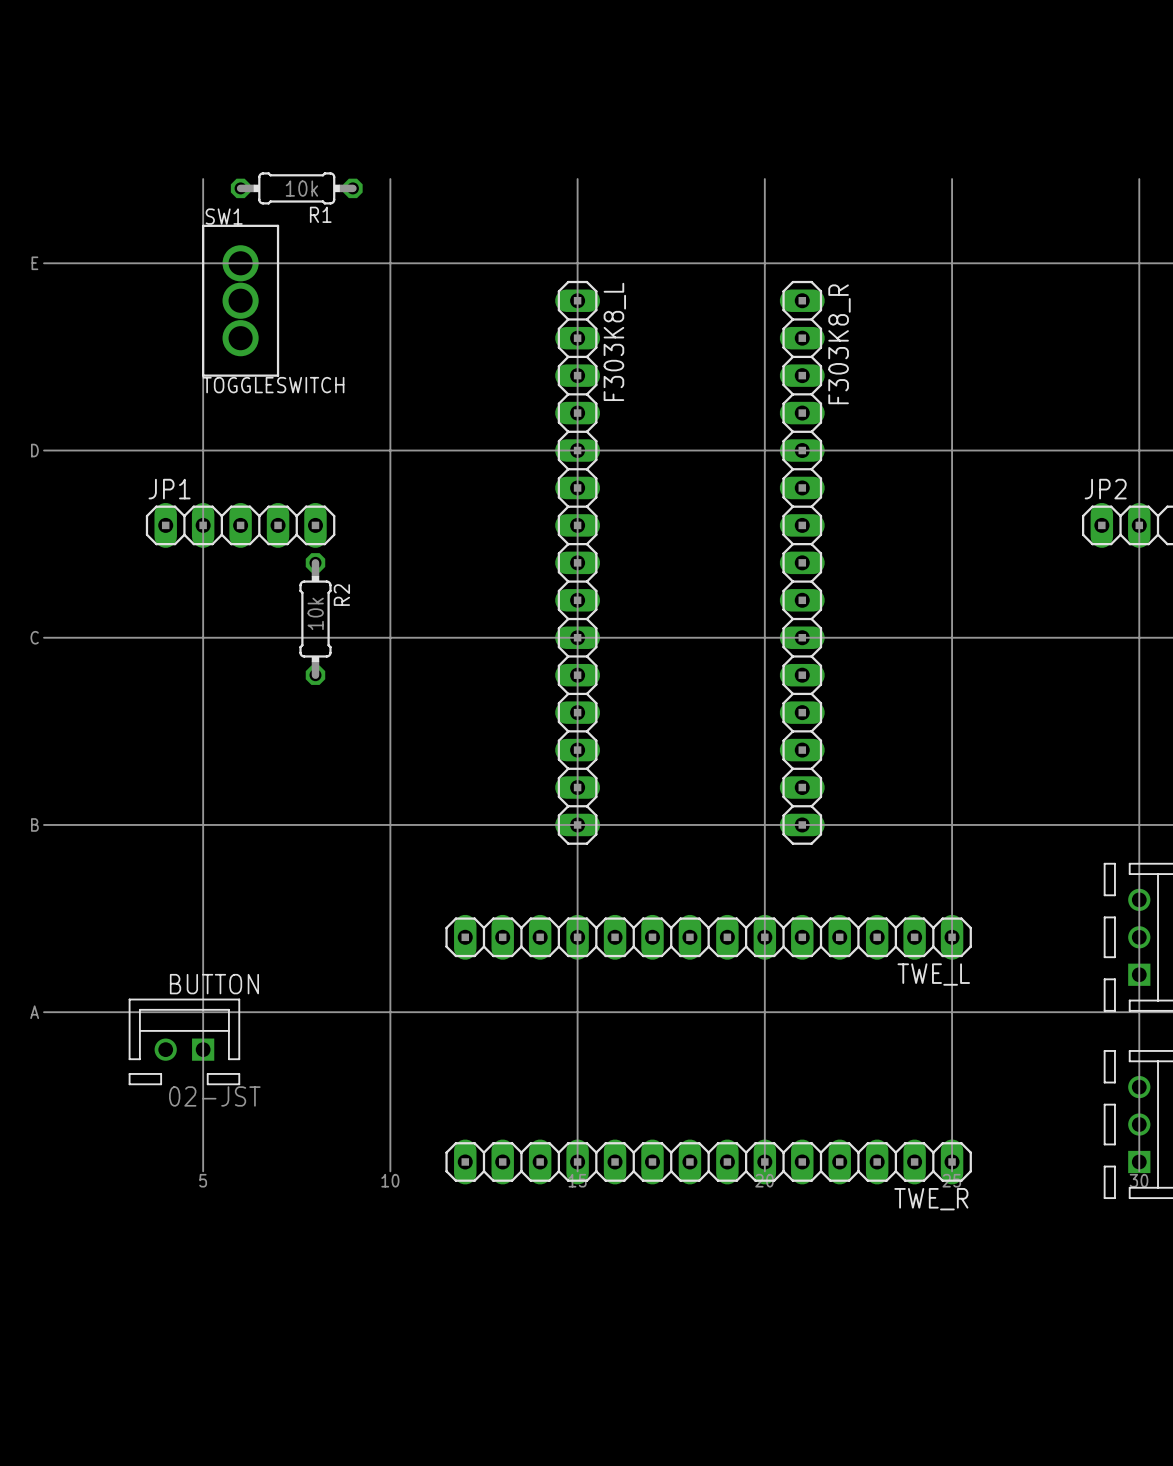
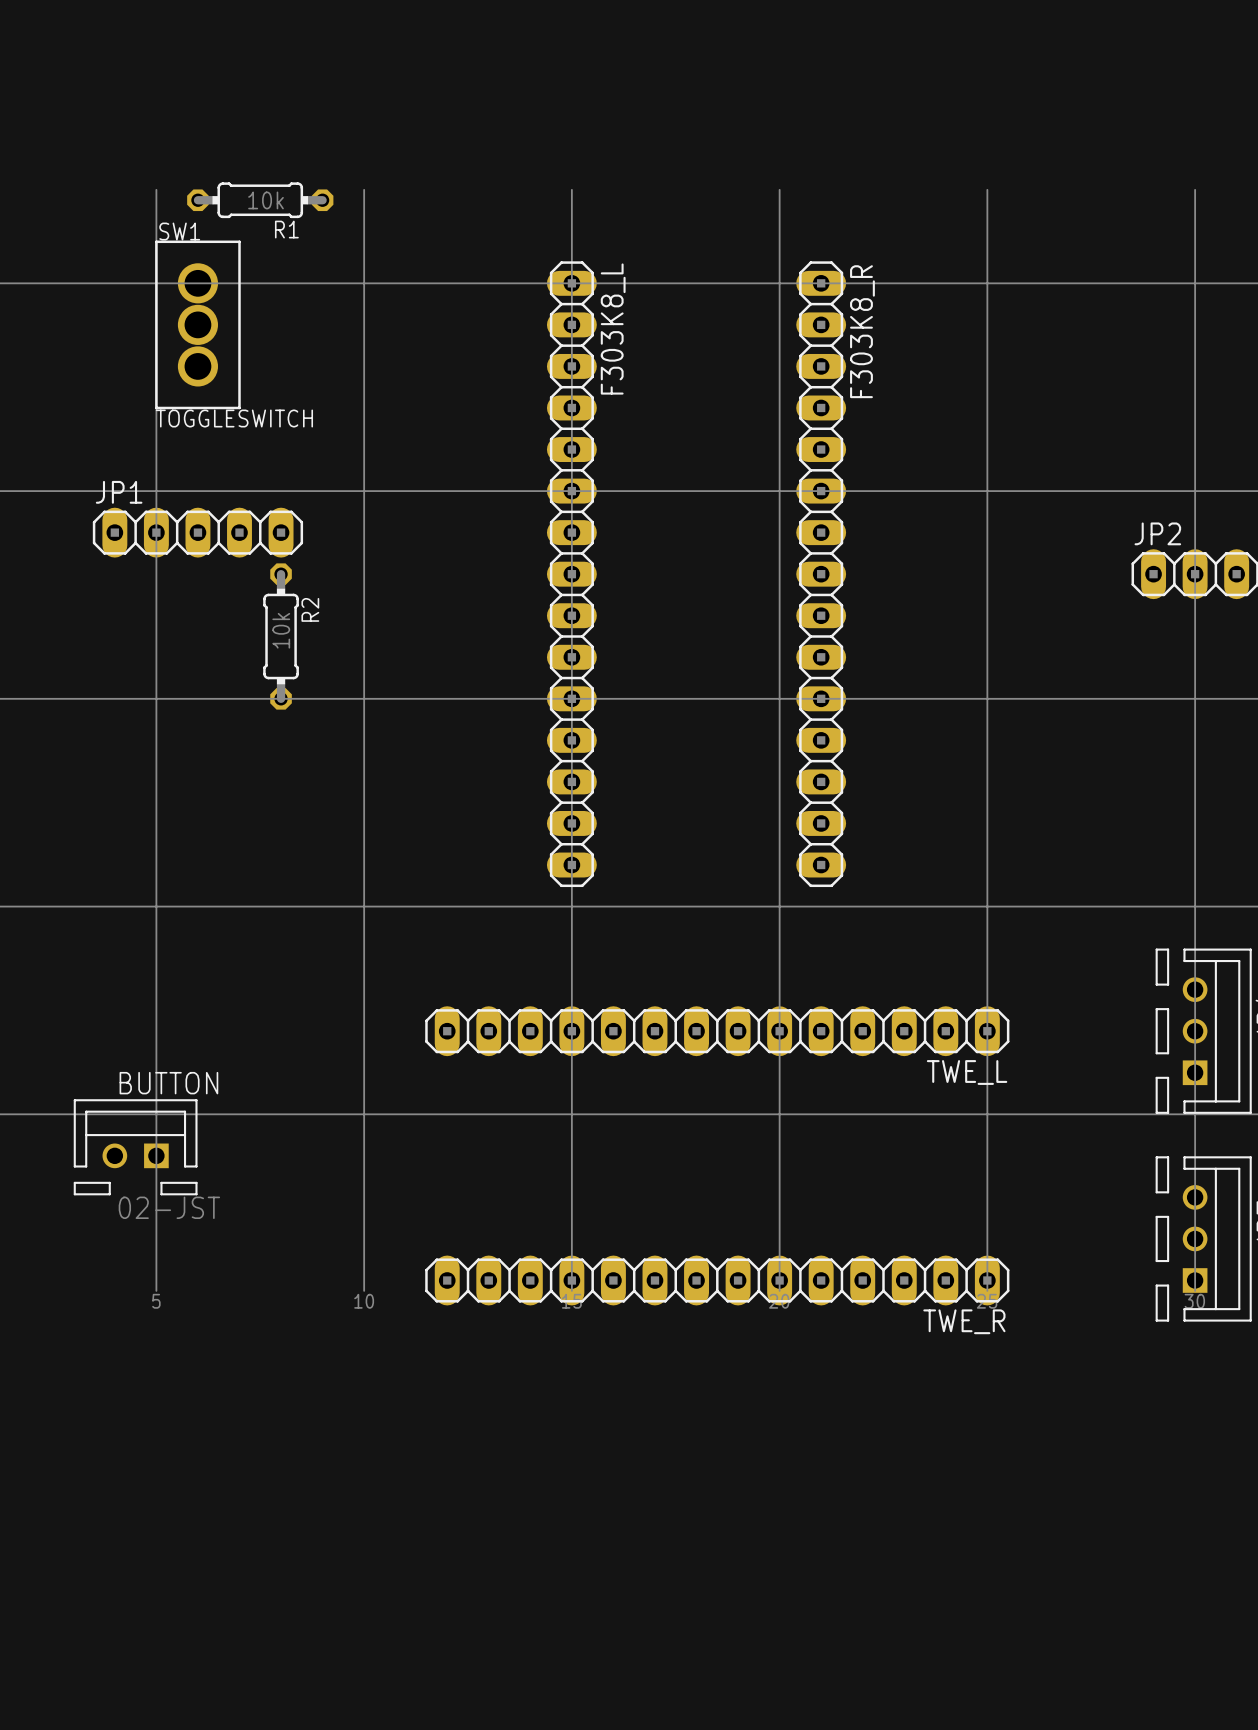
JP1 position: (240, 525) -> (197, 532)
F303K8_L position: (577, 562) -> (571, 574)
F303K8_R position: (802, 562) -> (821, 574)
R2 position: (315, 619) -> (281, 636)

